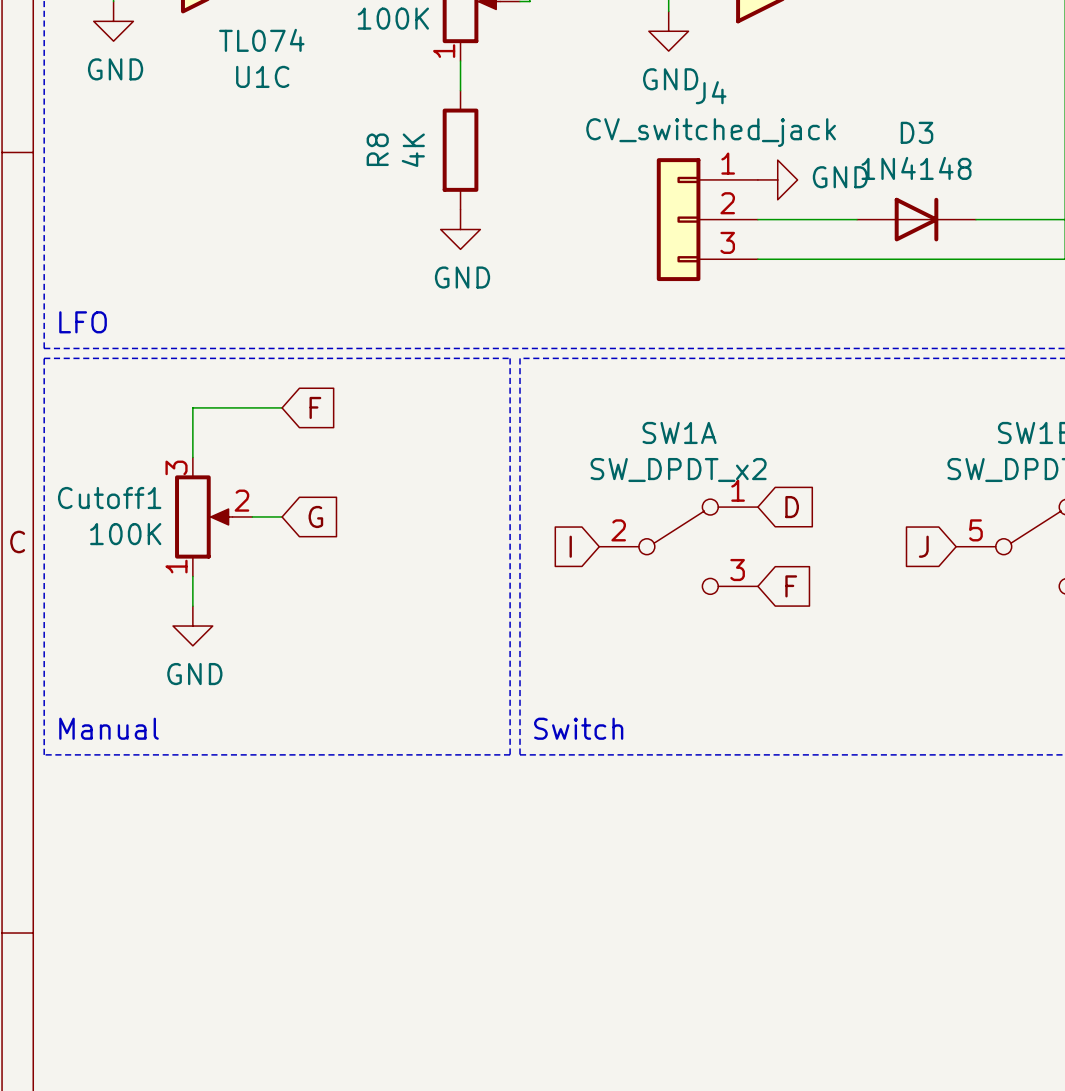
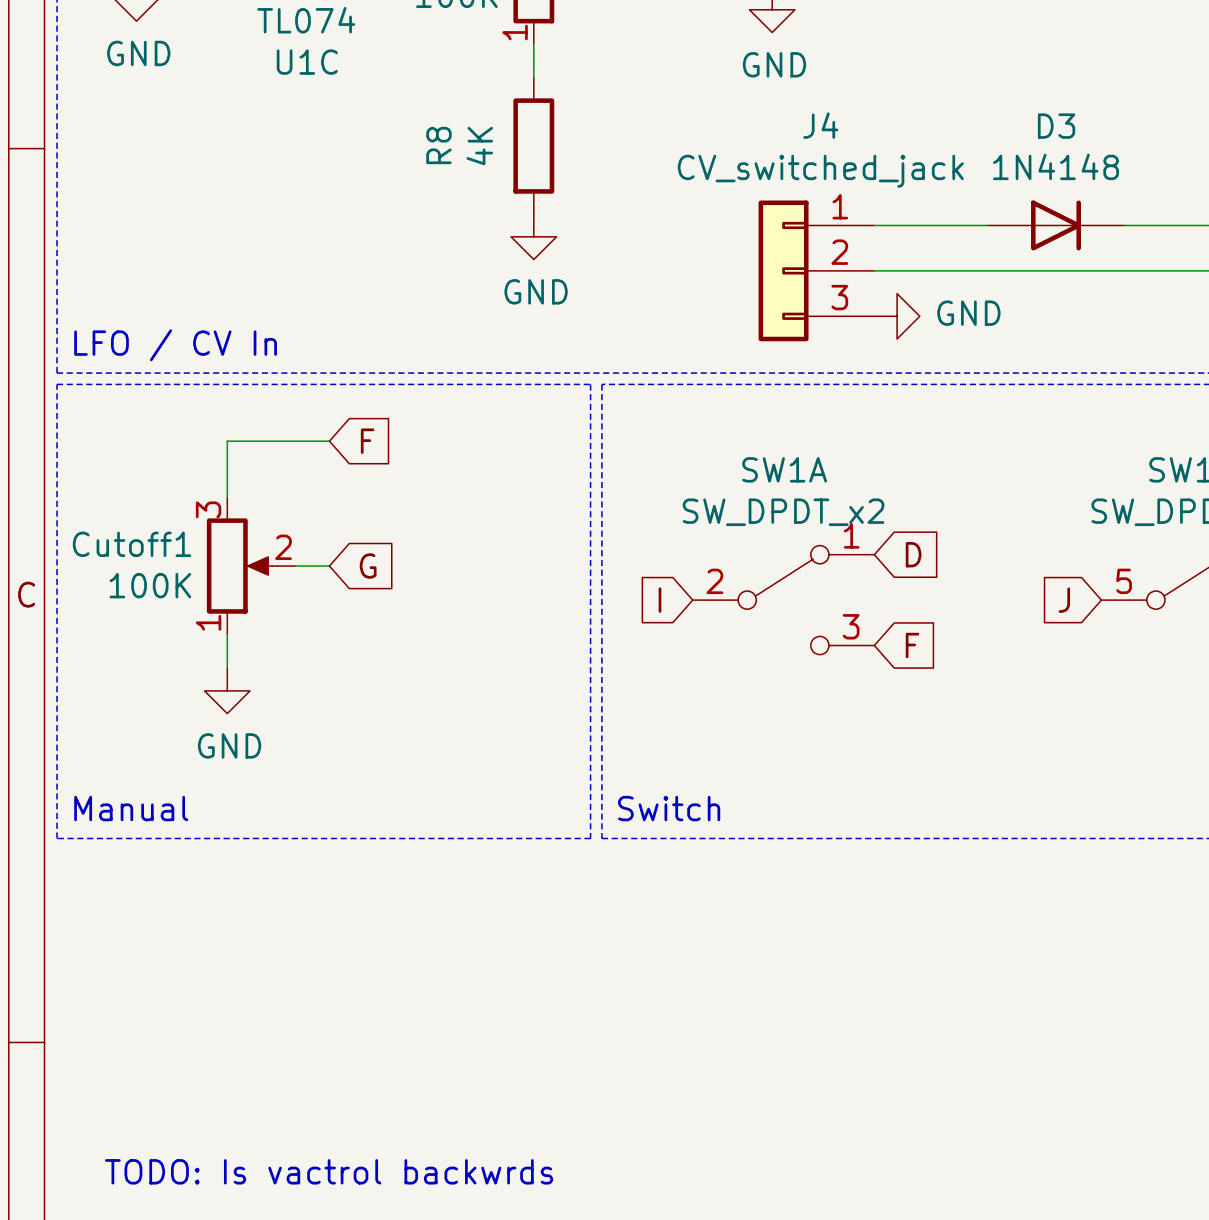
power symbol position: GND (777, 179) -> GND (897, 316)
J4 position: (707, 219) -> (816, 270)
text: LFO (83, 322) -> LFO / CV In (175, 345)
text: none -> TODO: Is vactrol backwrds (329, 1171)

